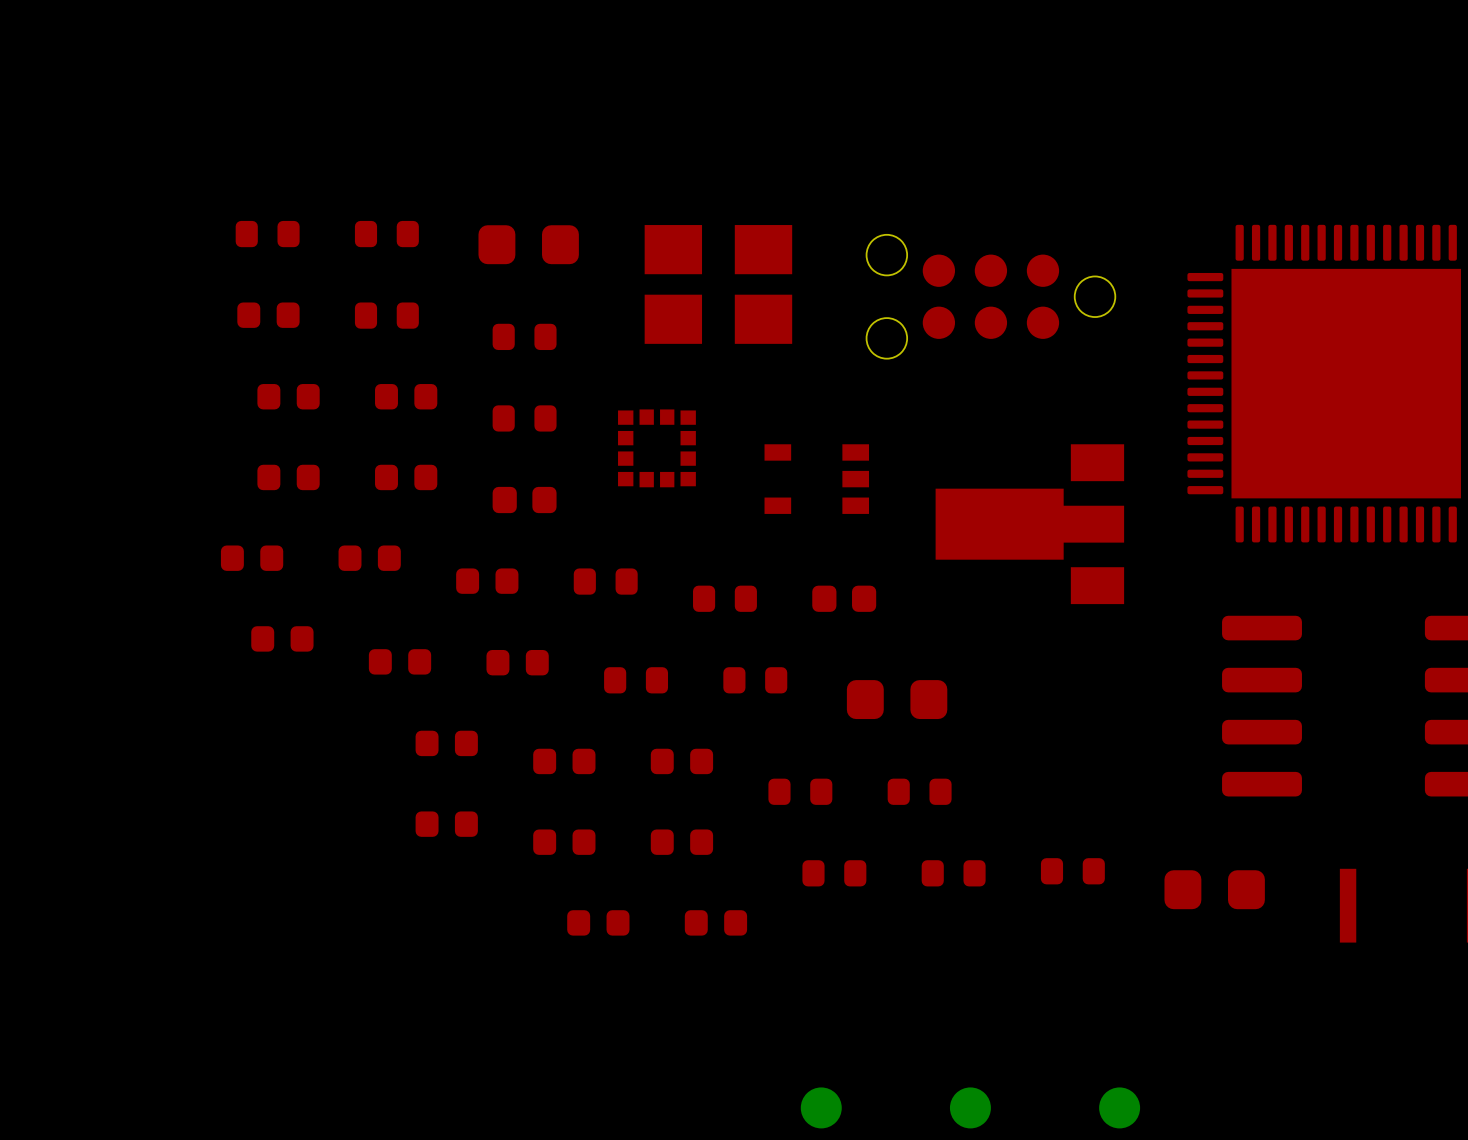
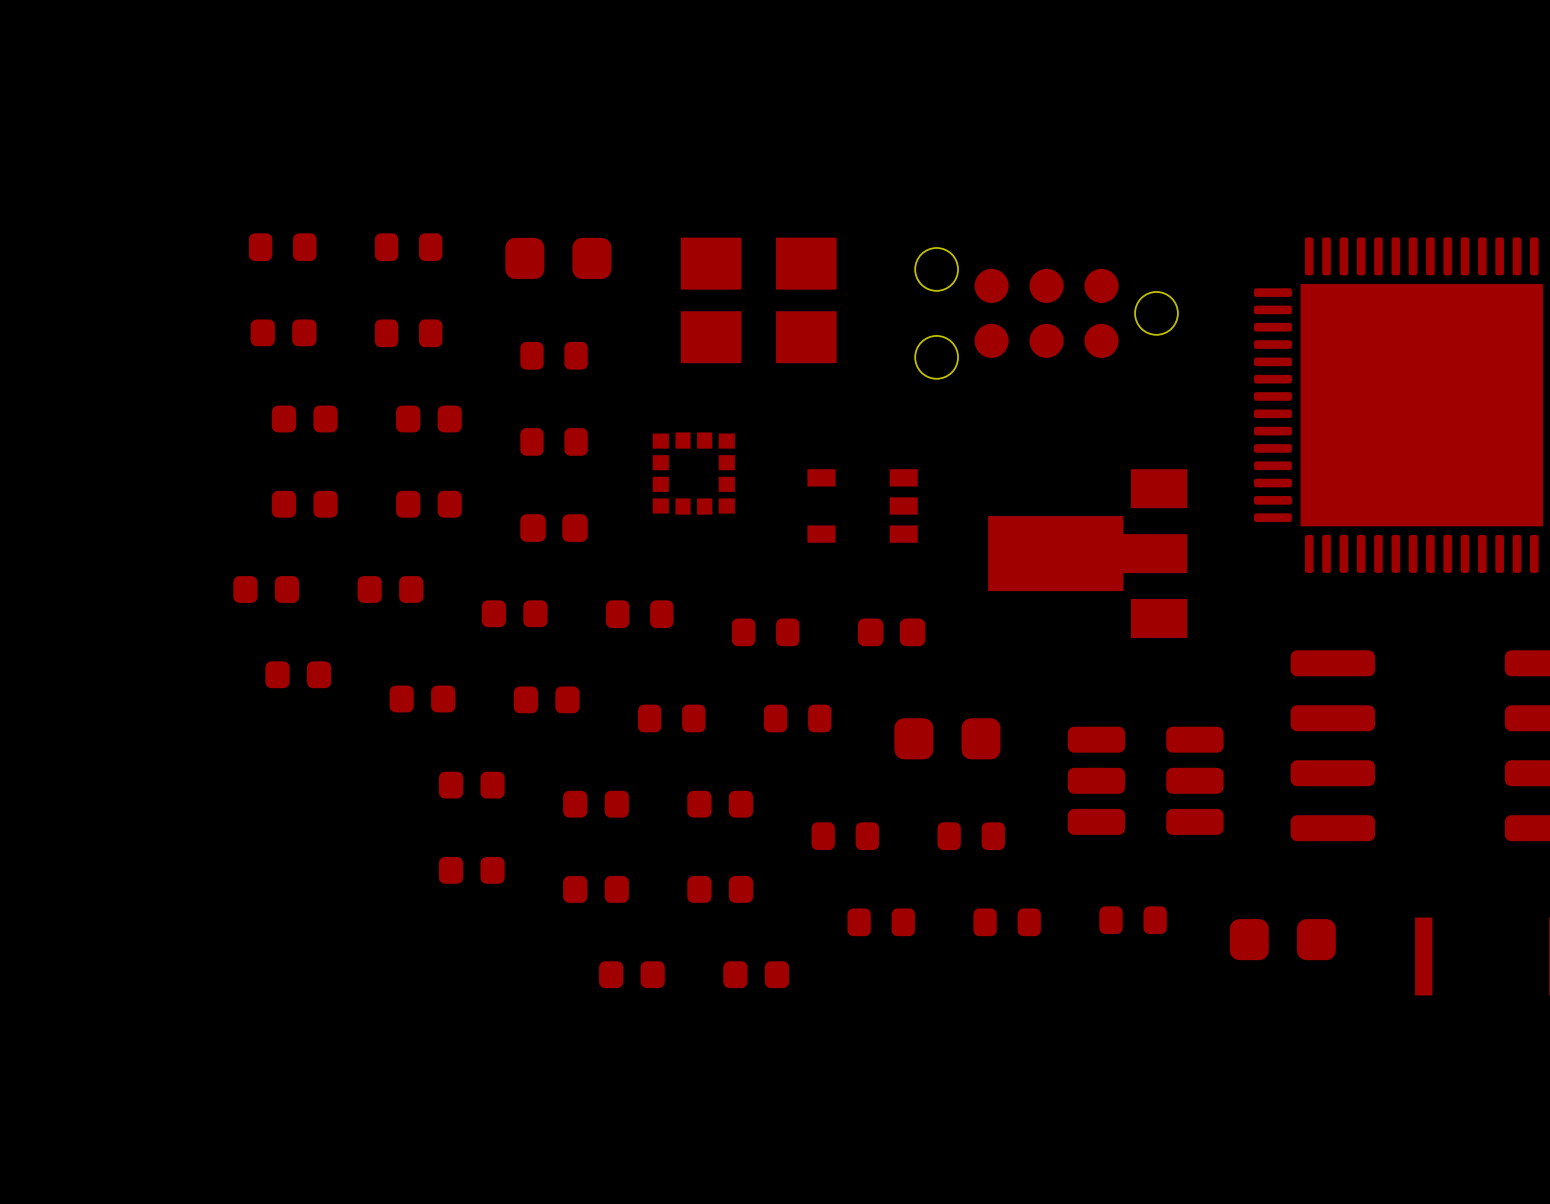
part: none -> (1145, 780)
part: (821, 1107) -> none
part: (970, 1107) -> none
part: (1119, 1107) -> none

